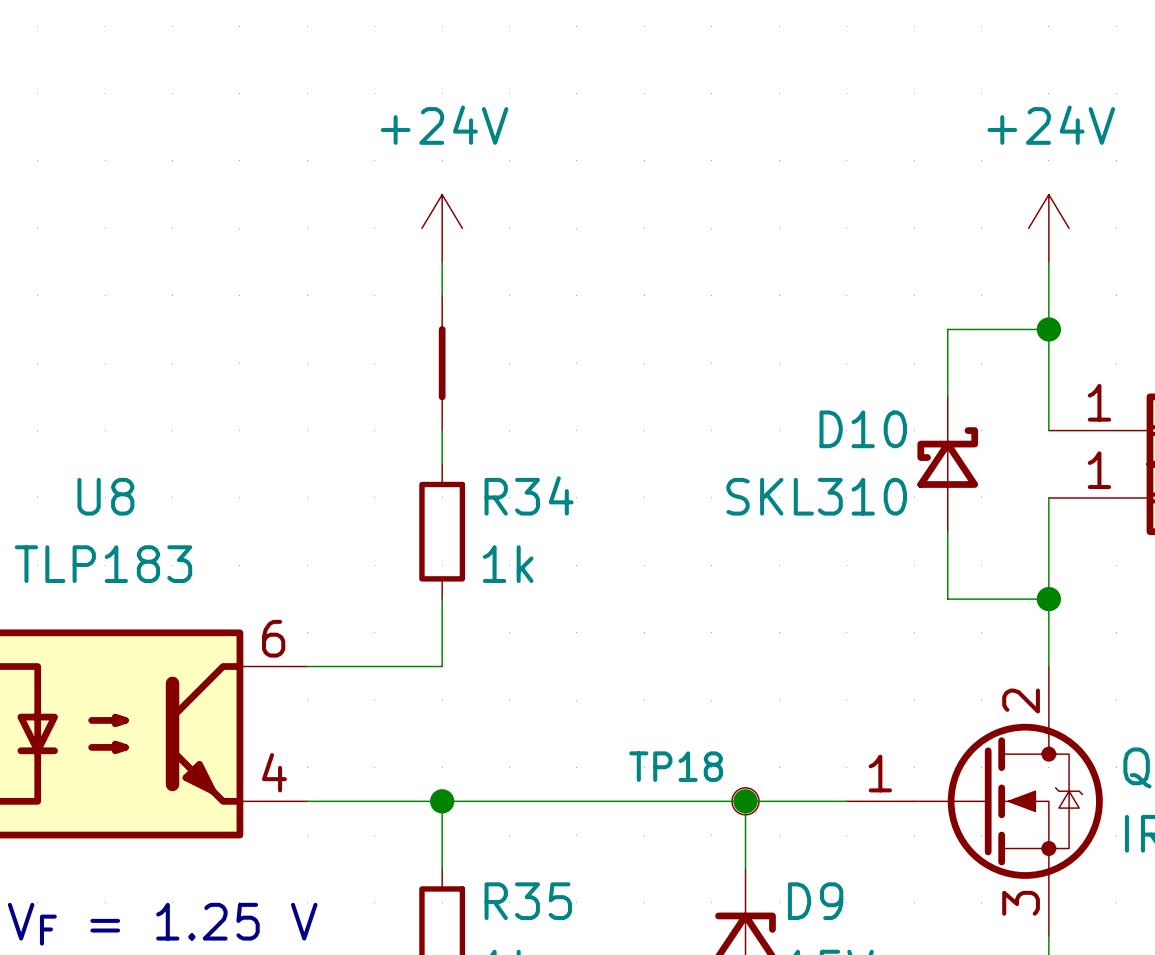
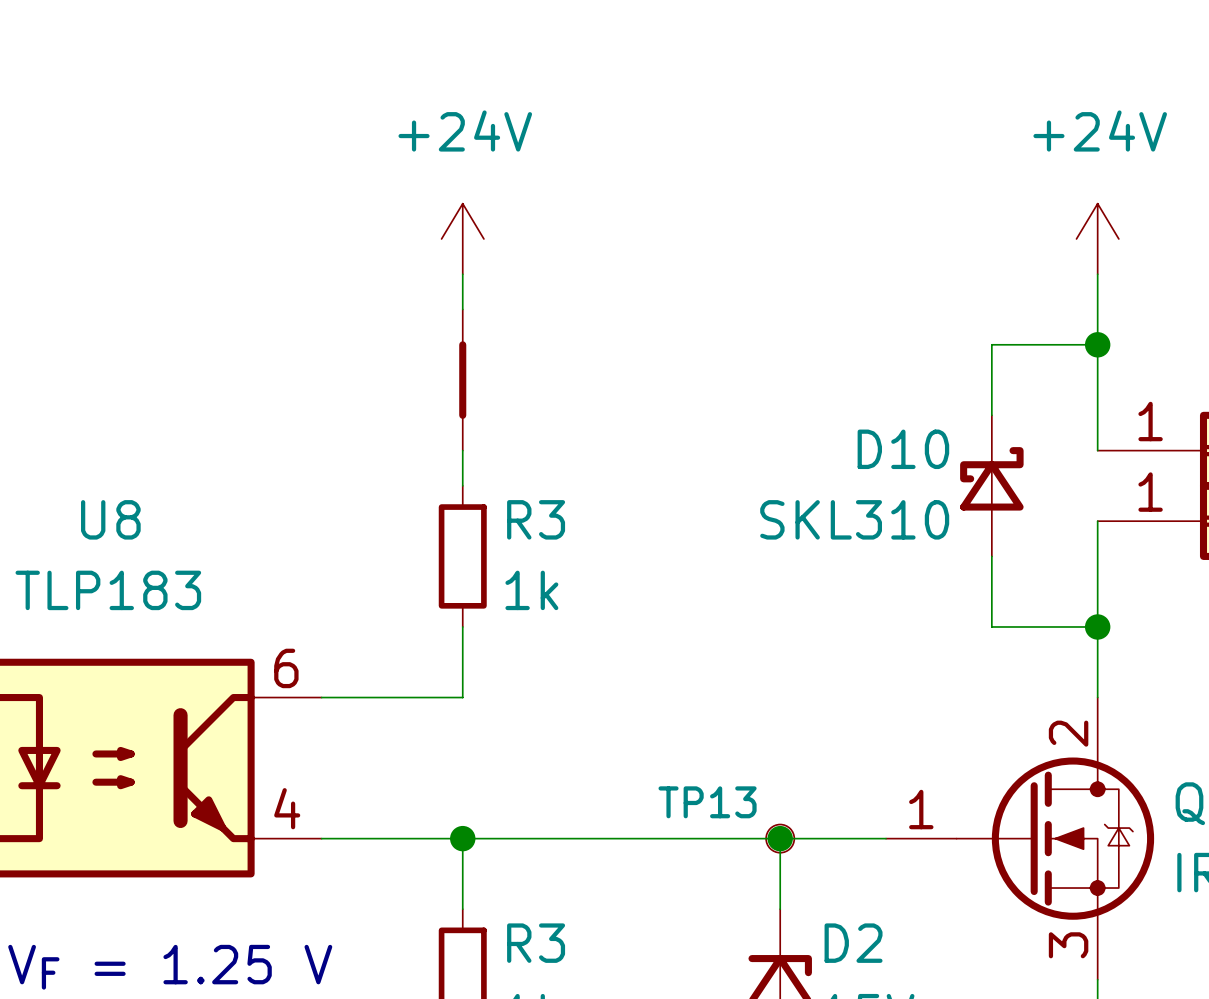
R34 name: R34 (529, 495) -> R3 (536, 519)
TP18 name: TP18 (676, 766) -> TP13 (707, 802)
R35 name: R35 (528, 901) -> R3 (536, 943)
D9 name: D9 (815, 901) -> D2 (853, 943)

